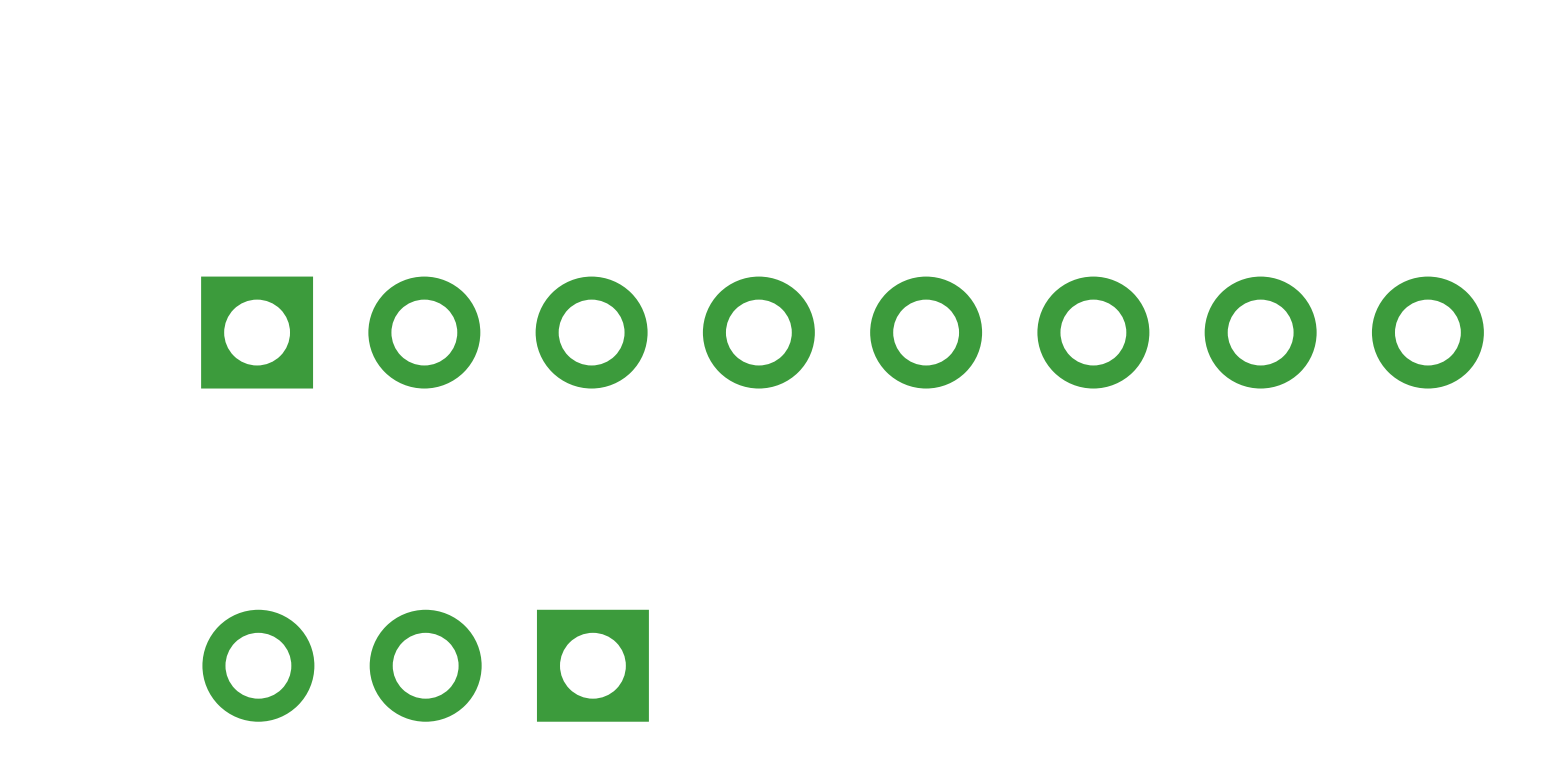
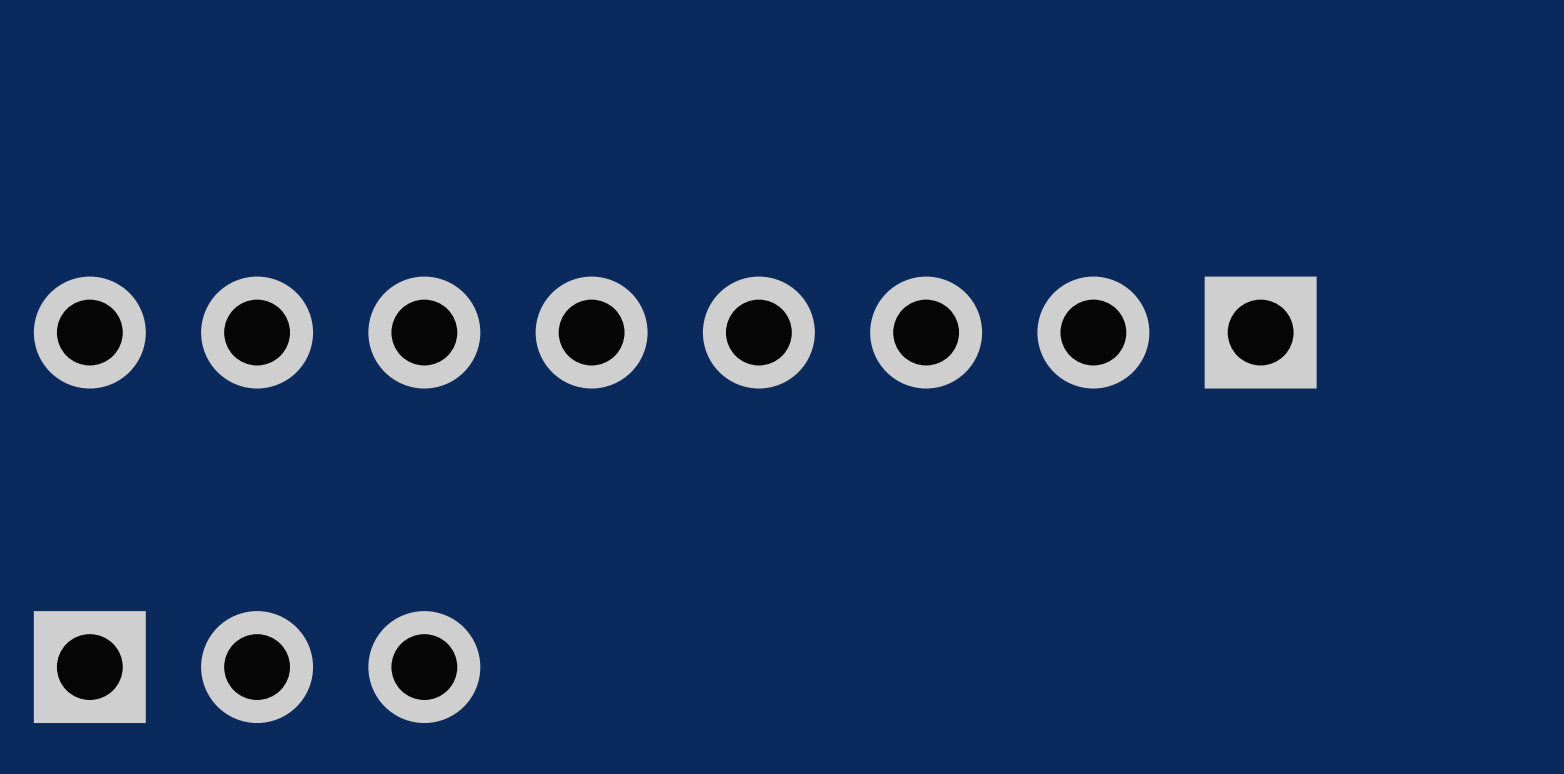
part rotation: 0° (842, 332) -> 180° (675, 332)
part rotation: 0° (425, 665) -> 180° (257, 667)

